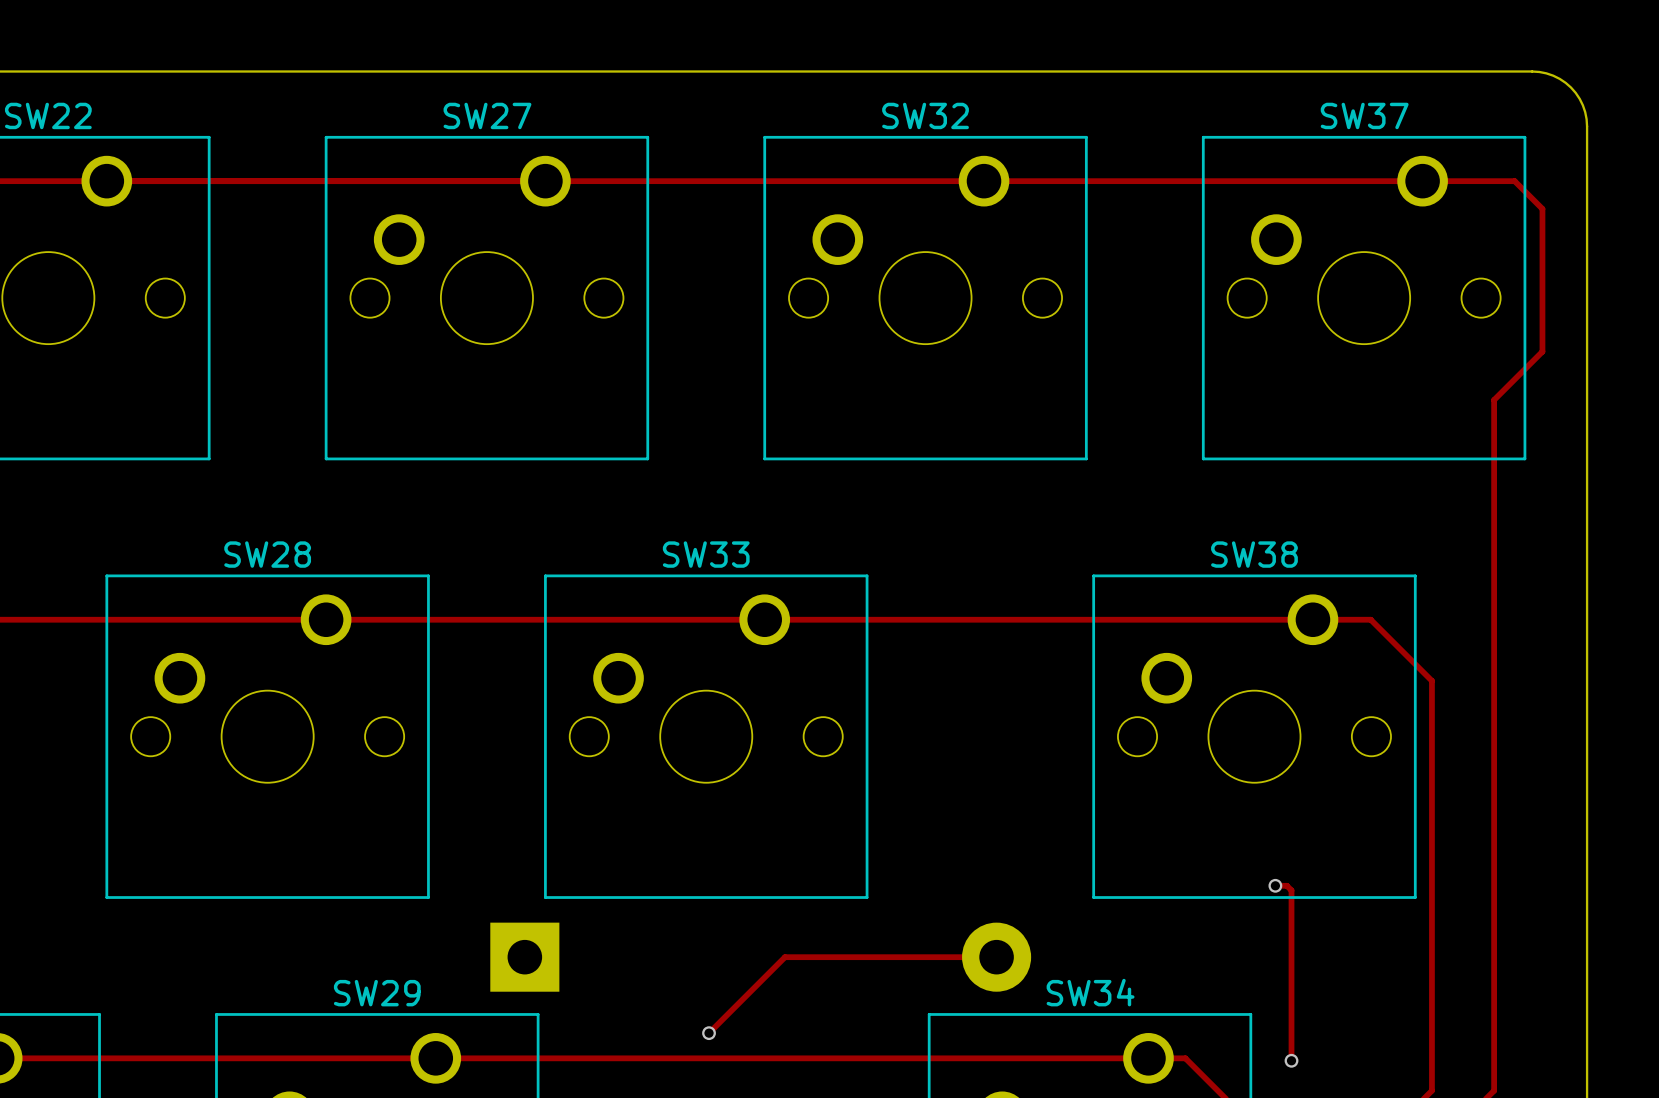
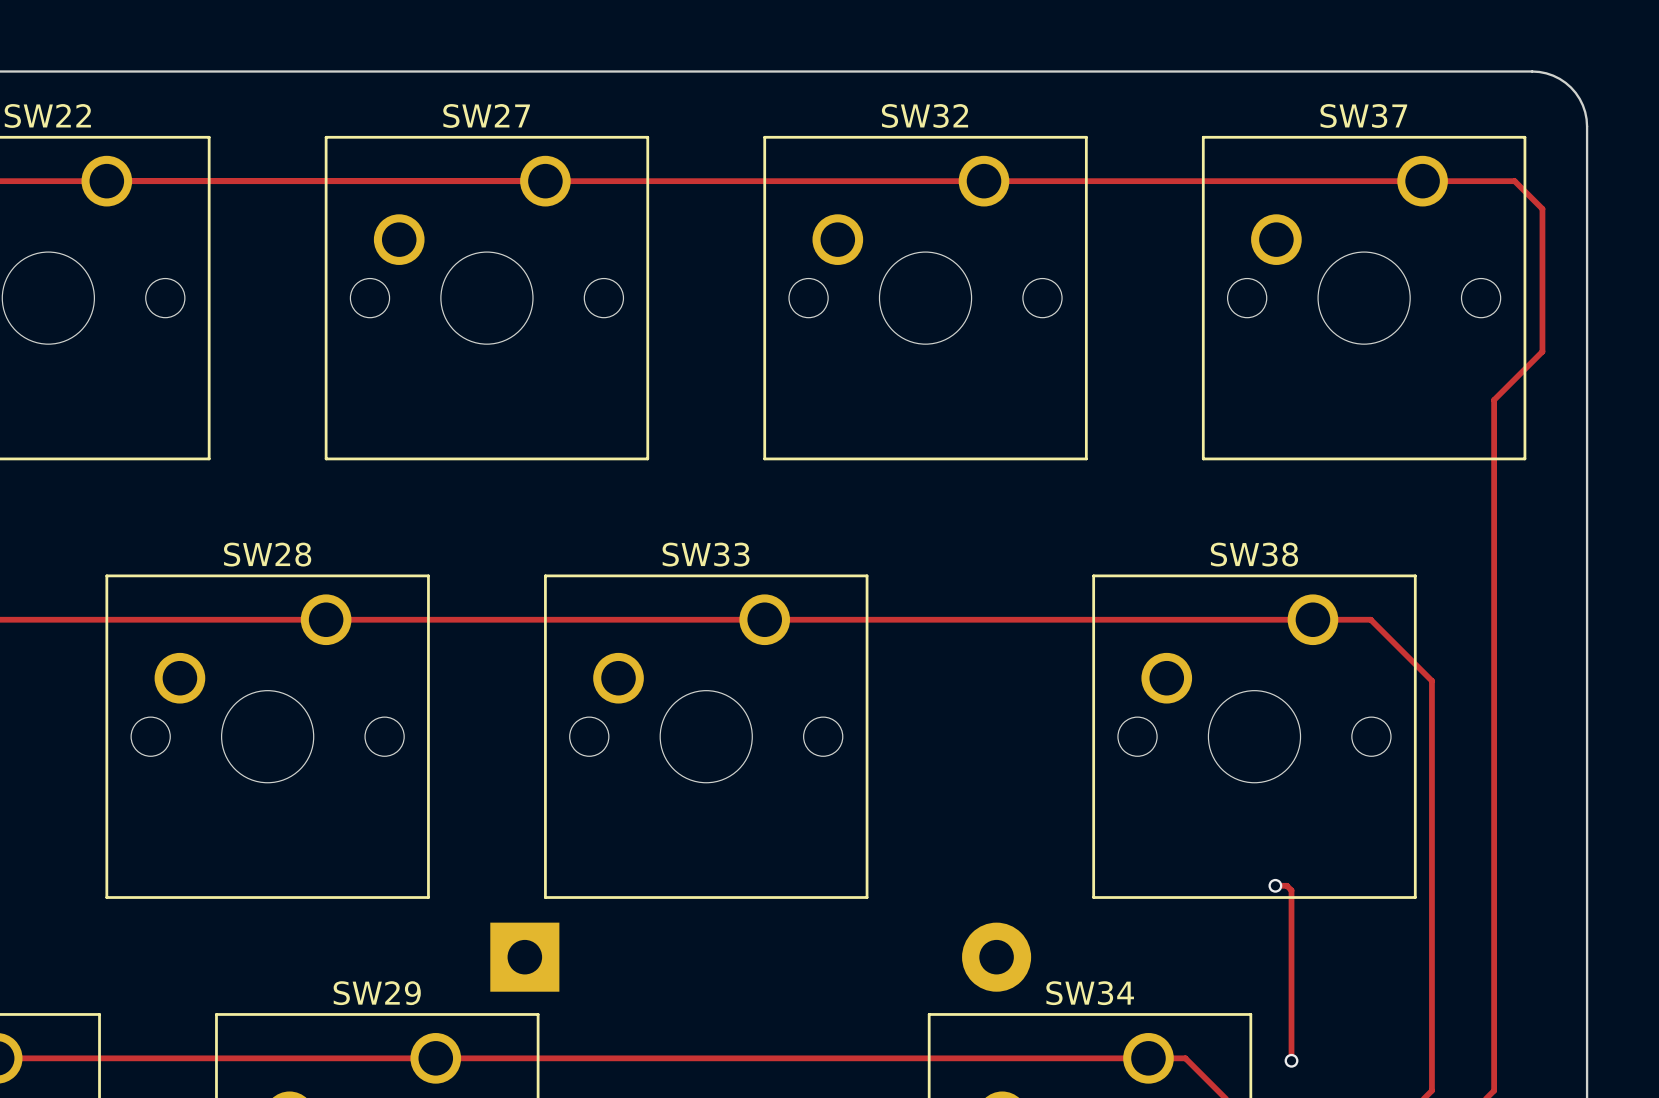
track: (996, 957) (785, 957) (709, 1033) -> none
via: (709, 1033) -> none

